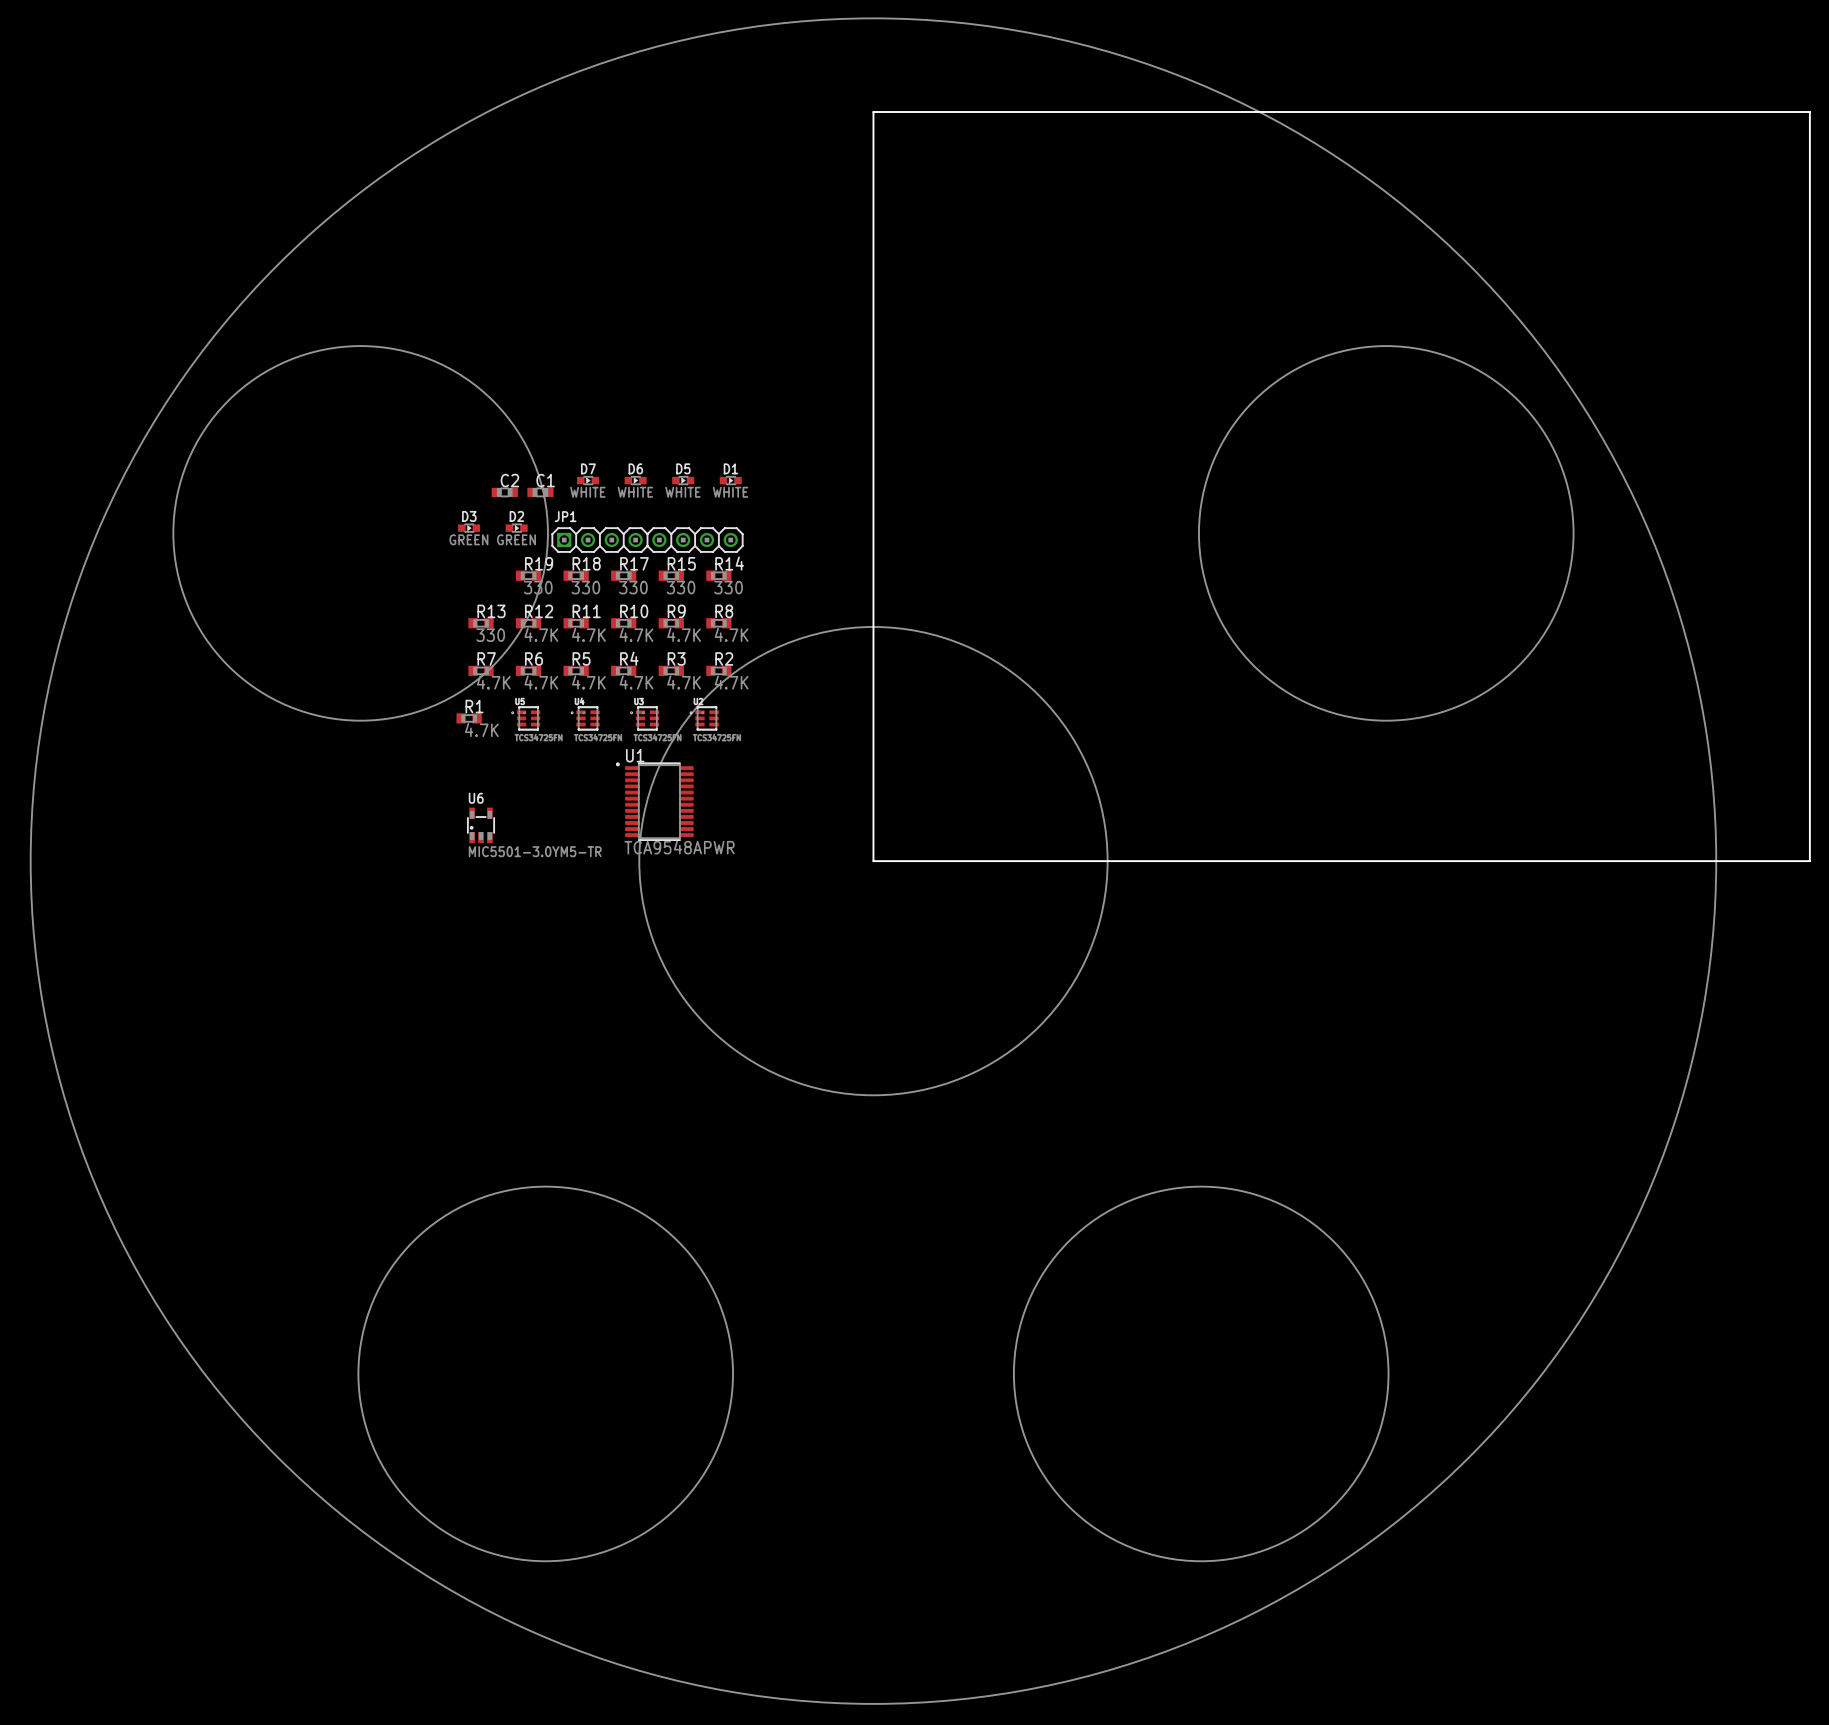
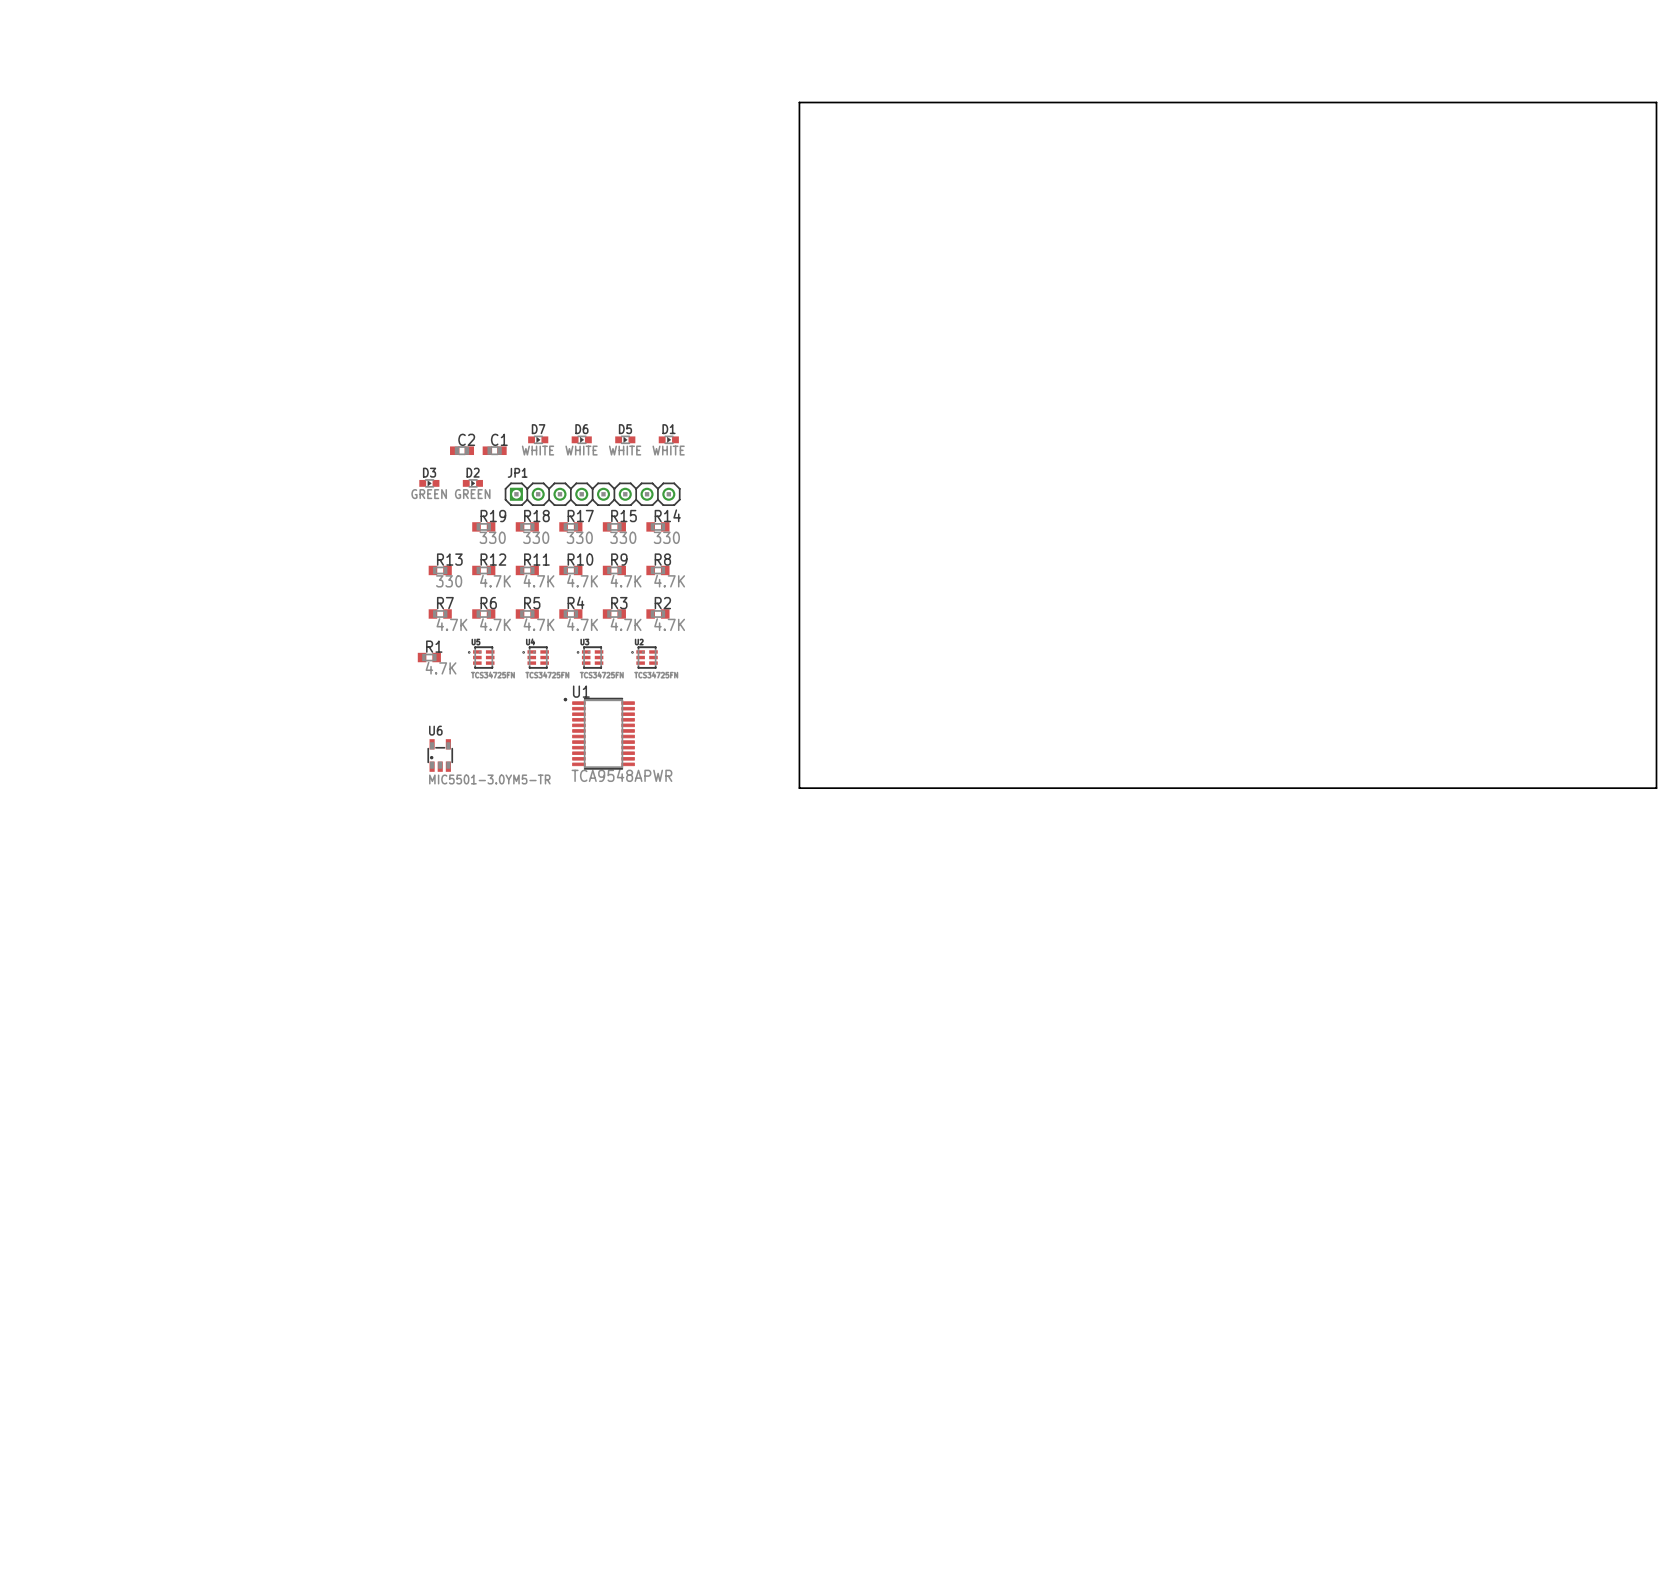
drawing: [29, 17, 1717, 1705] -> none

